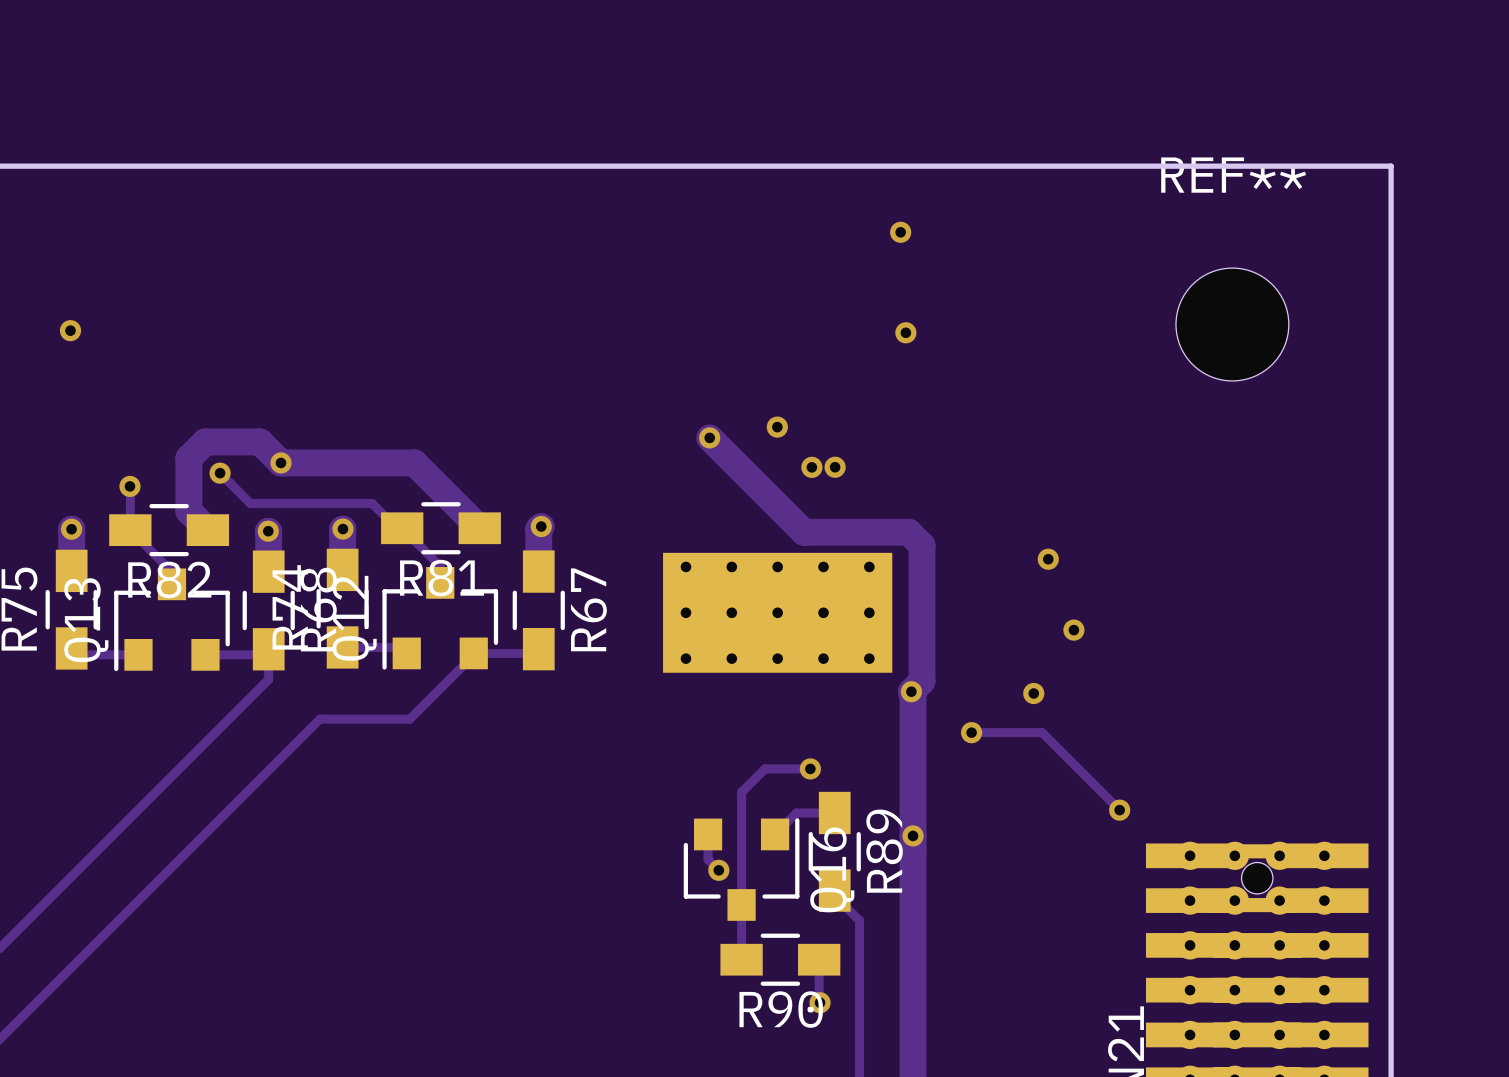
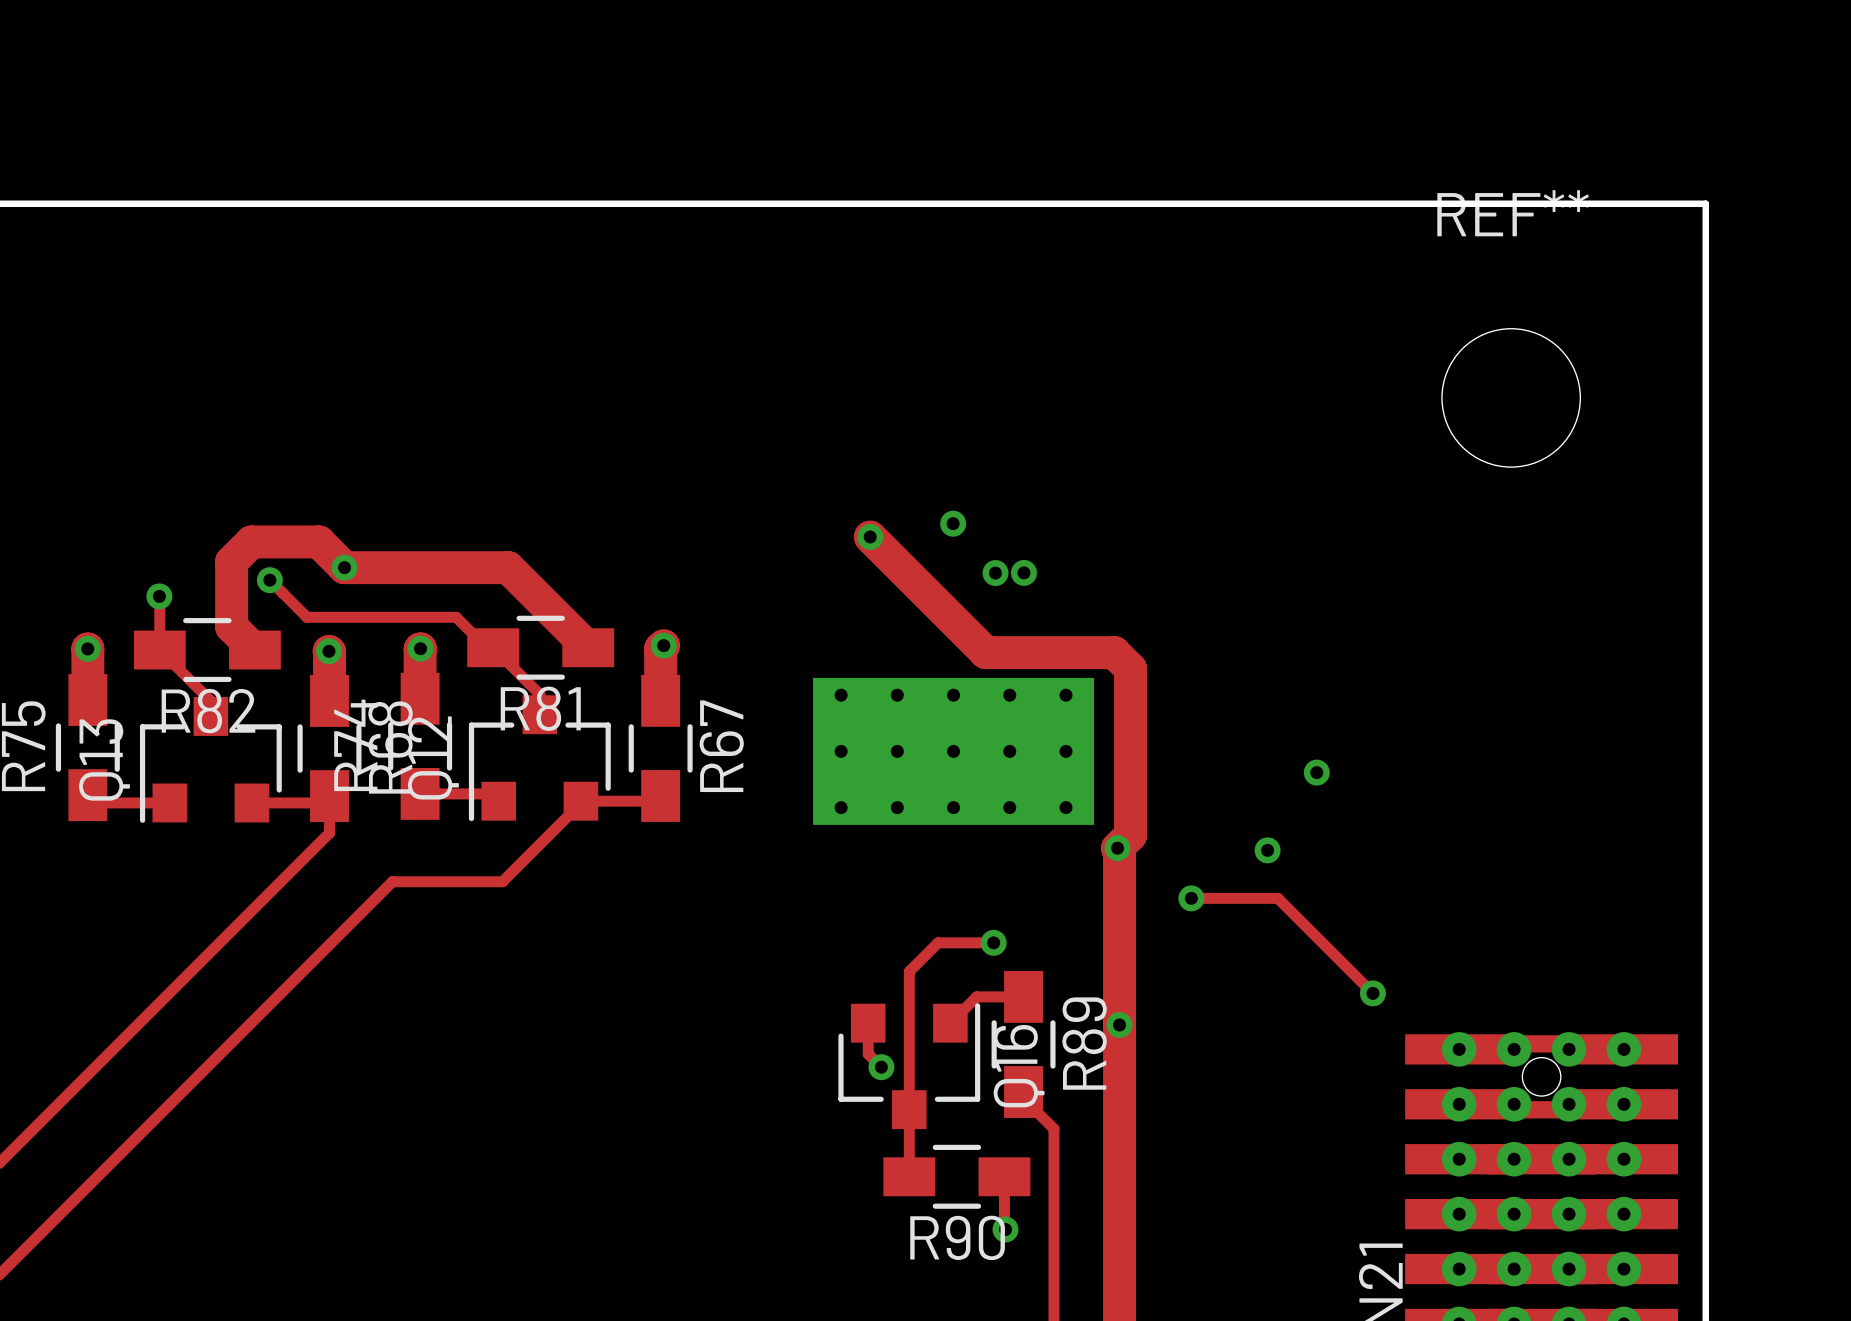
via: (900, 232) -> none
via: (70, 330) -> none
via: (905, 332) -> none
via: (1048, 559) -> none

